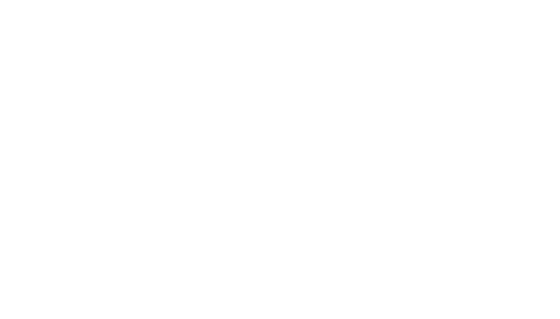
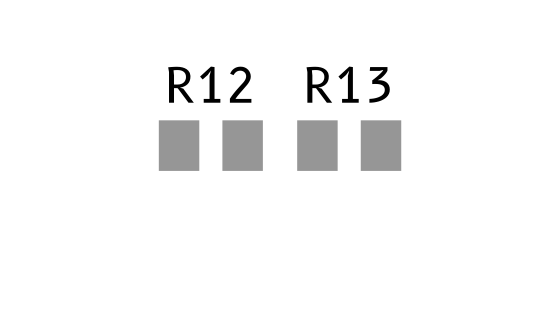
R12: none -> (210, 145)
R13: none -> (349, 145)

